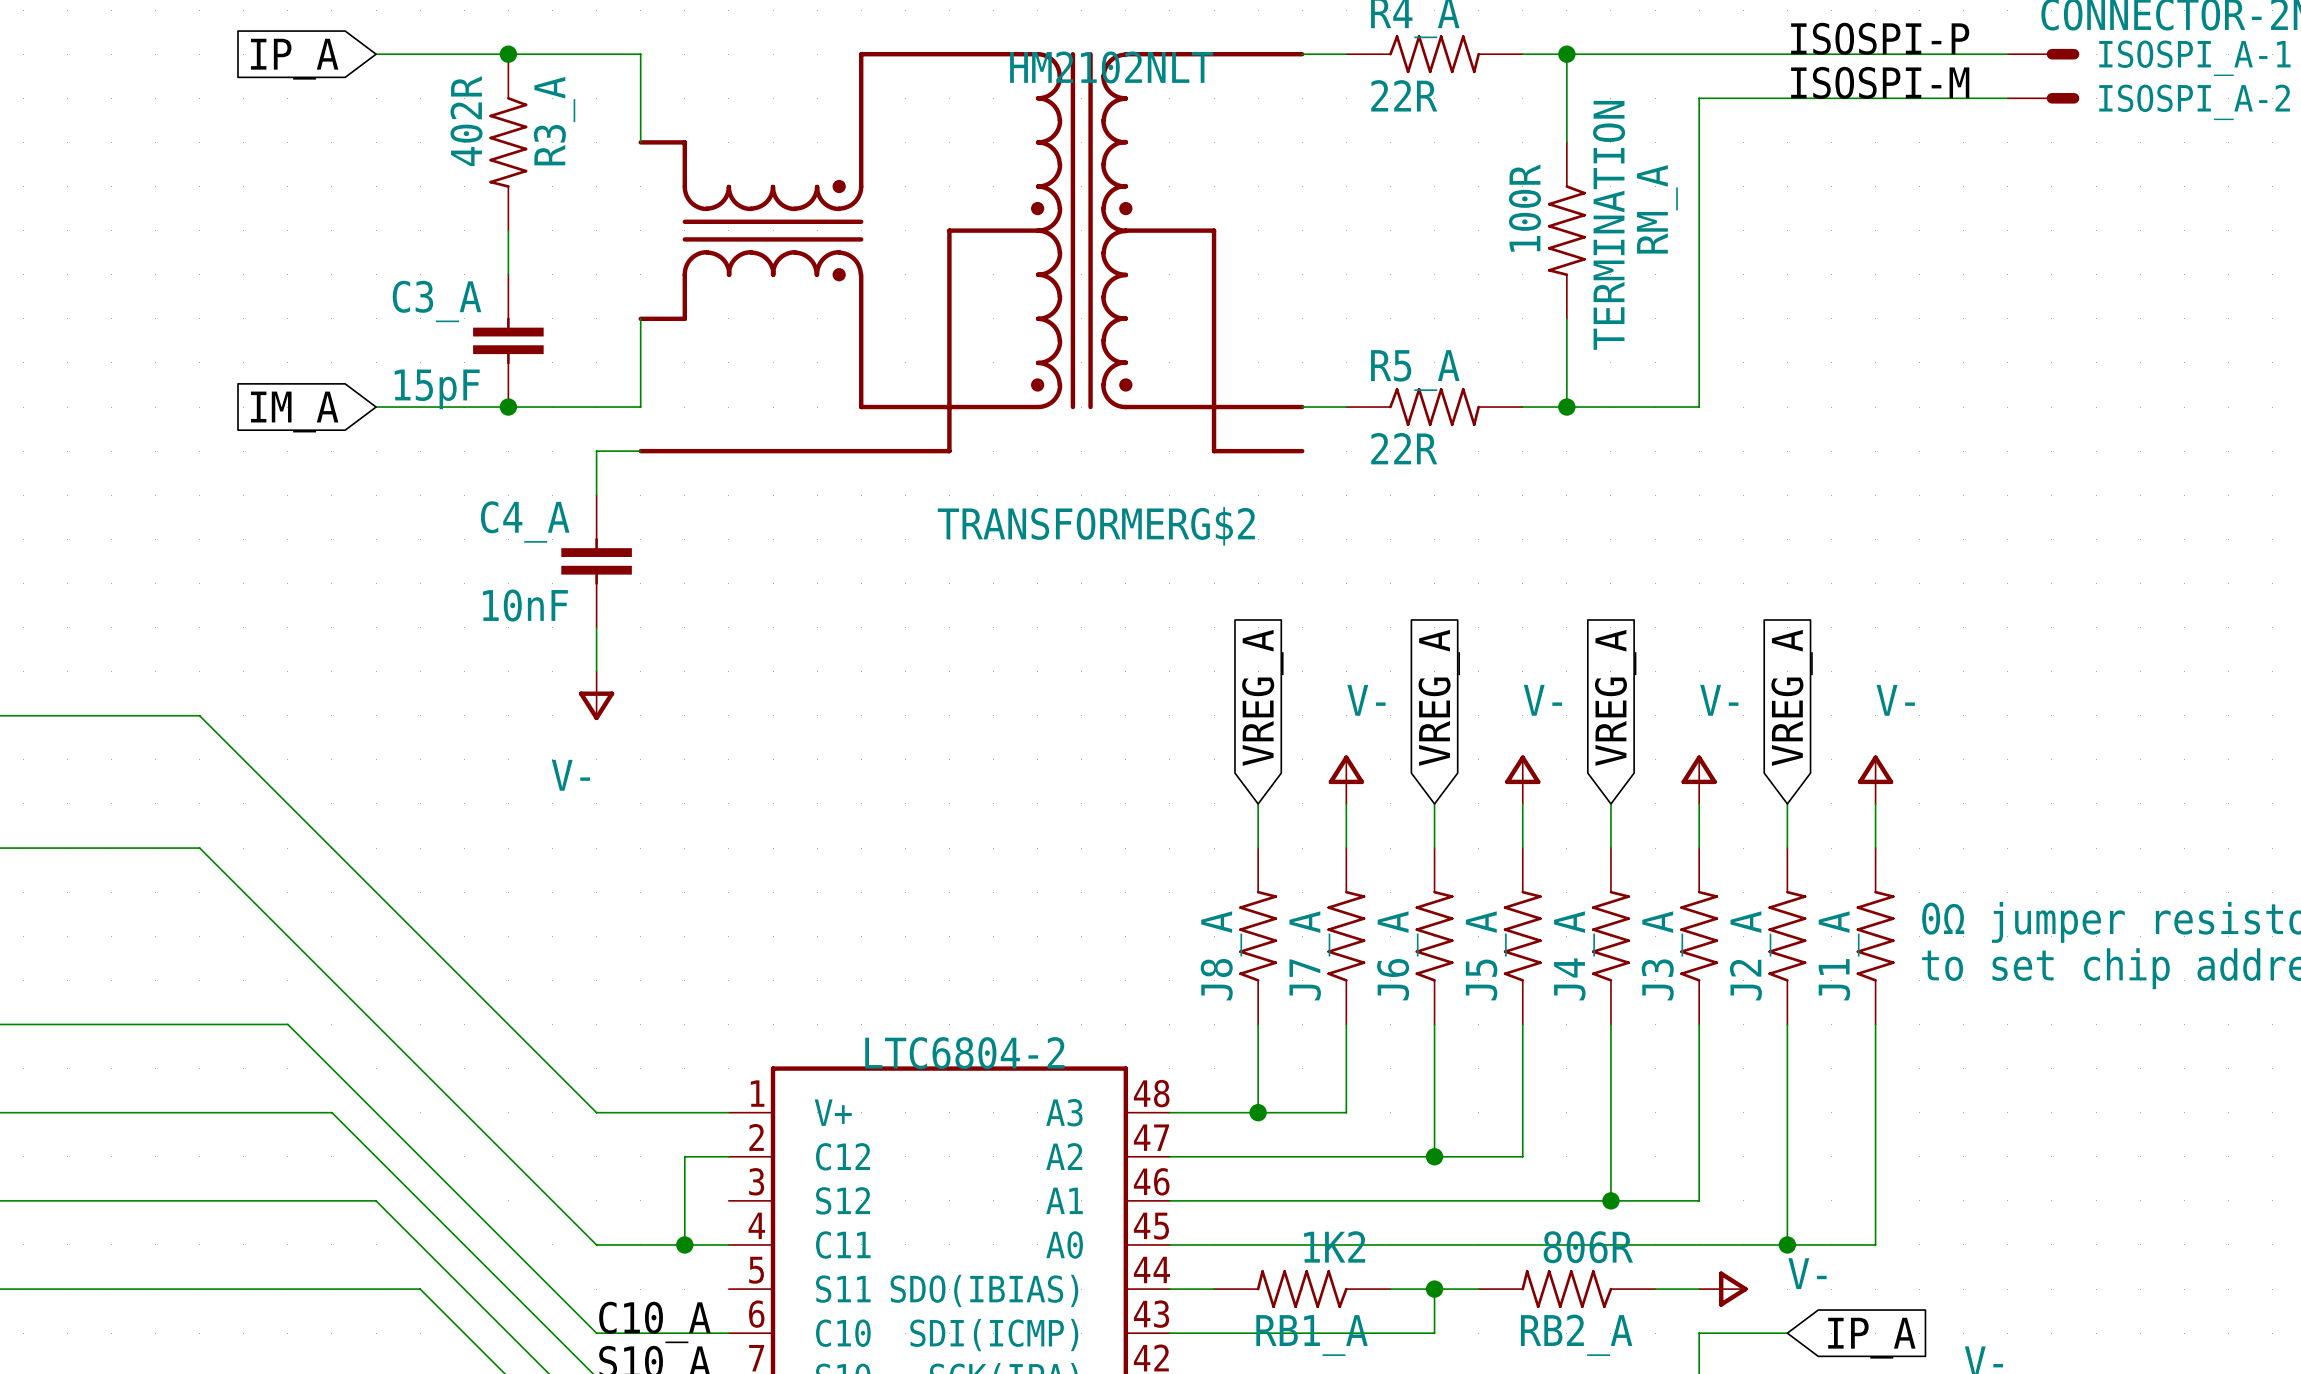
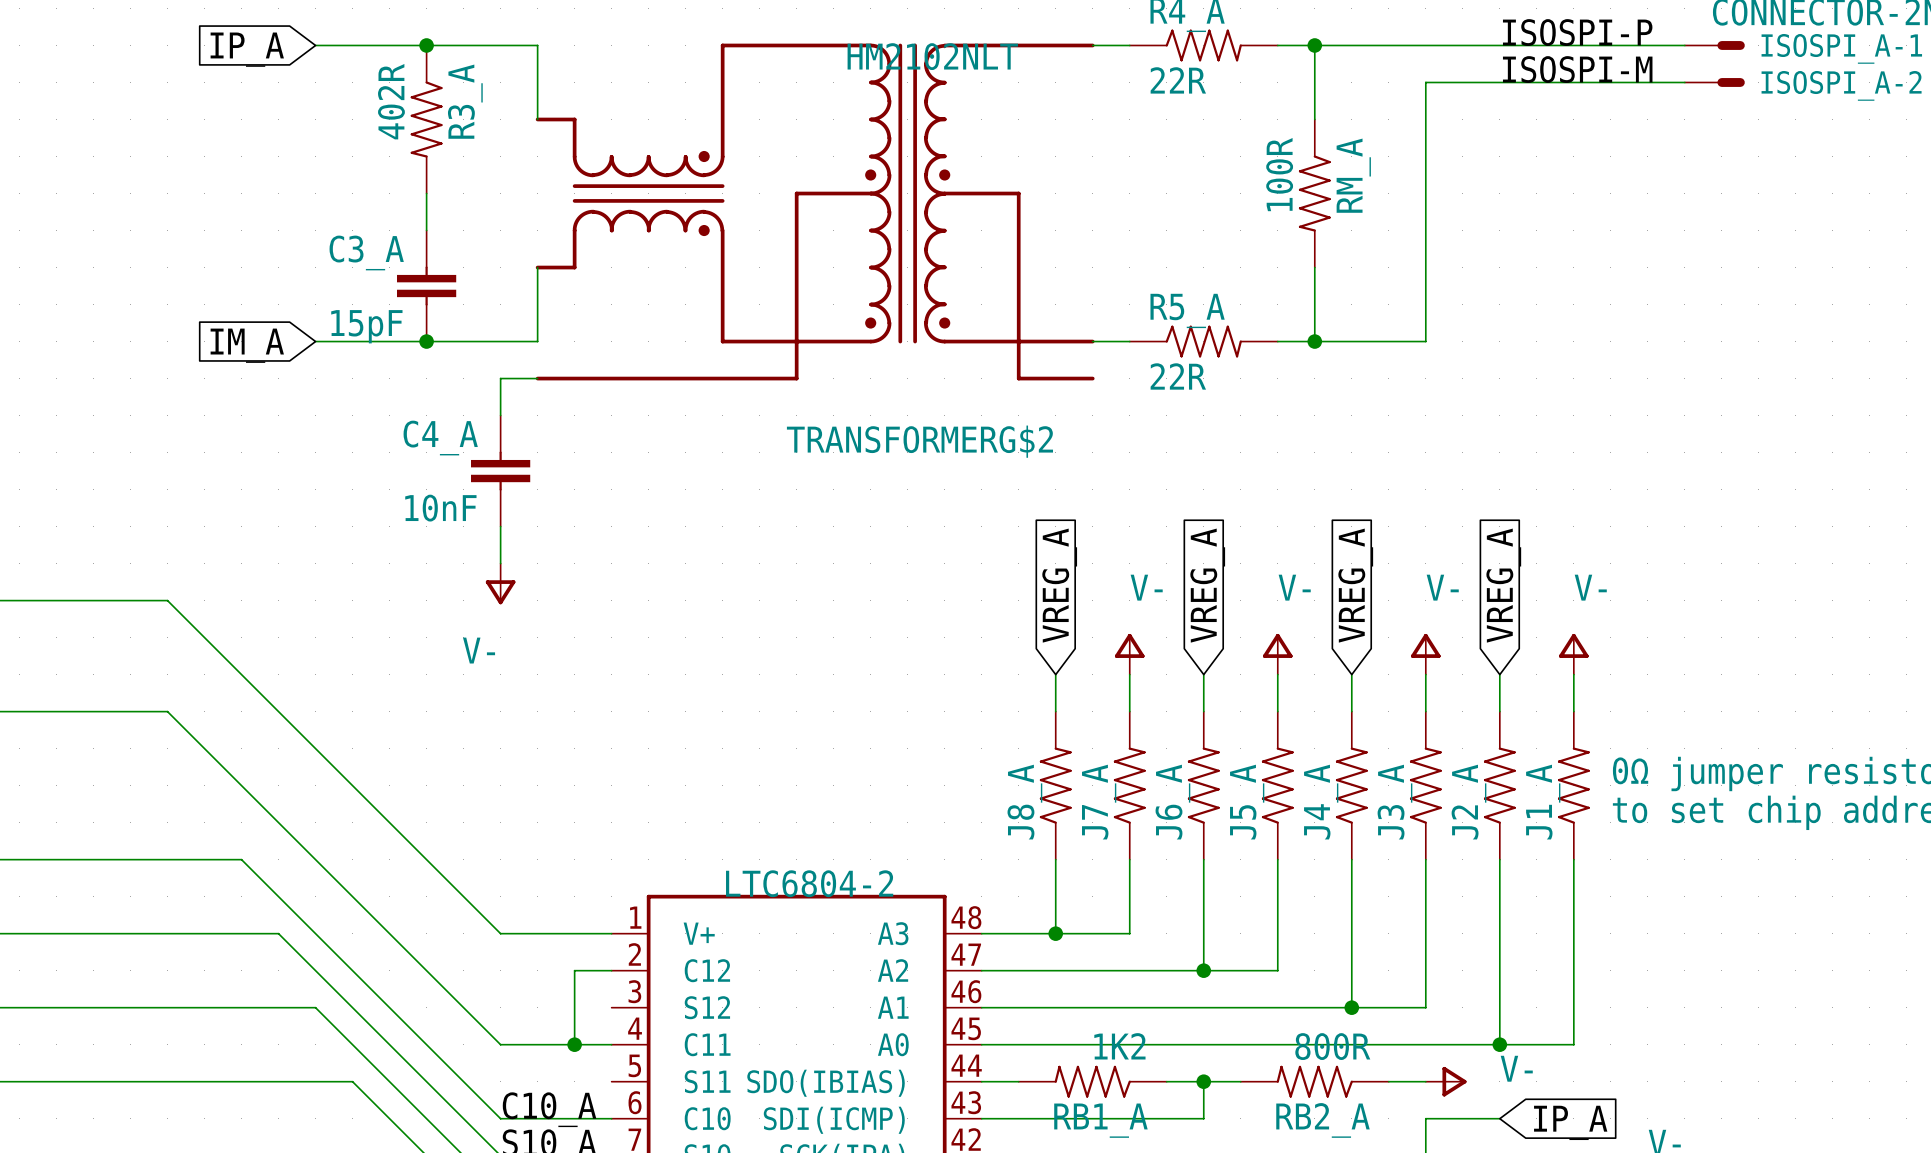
RM_A name position: RM_A (1657, 209) -> RM_A (1353, 175)
RM_A text: TERMINATION (1609, 225) -> none
RB2_A value: 806R (1588, 1247) -> 800R (1332, 1046)

